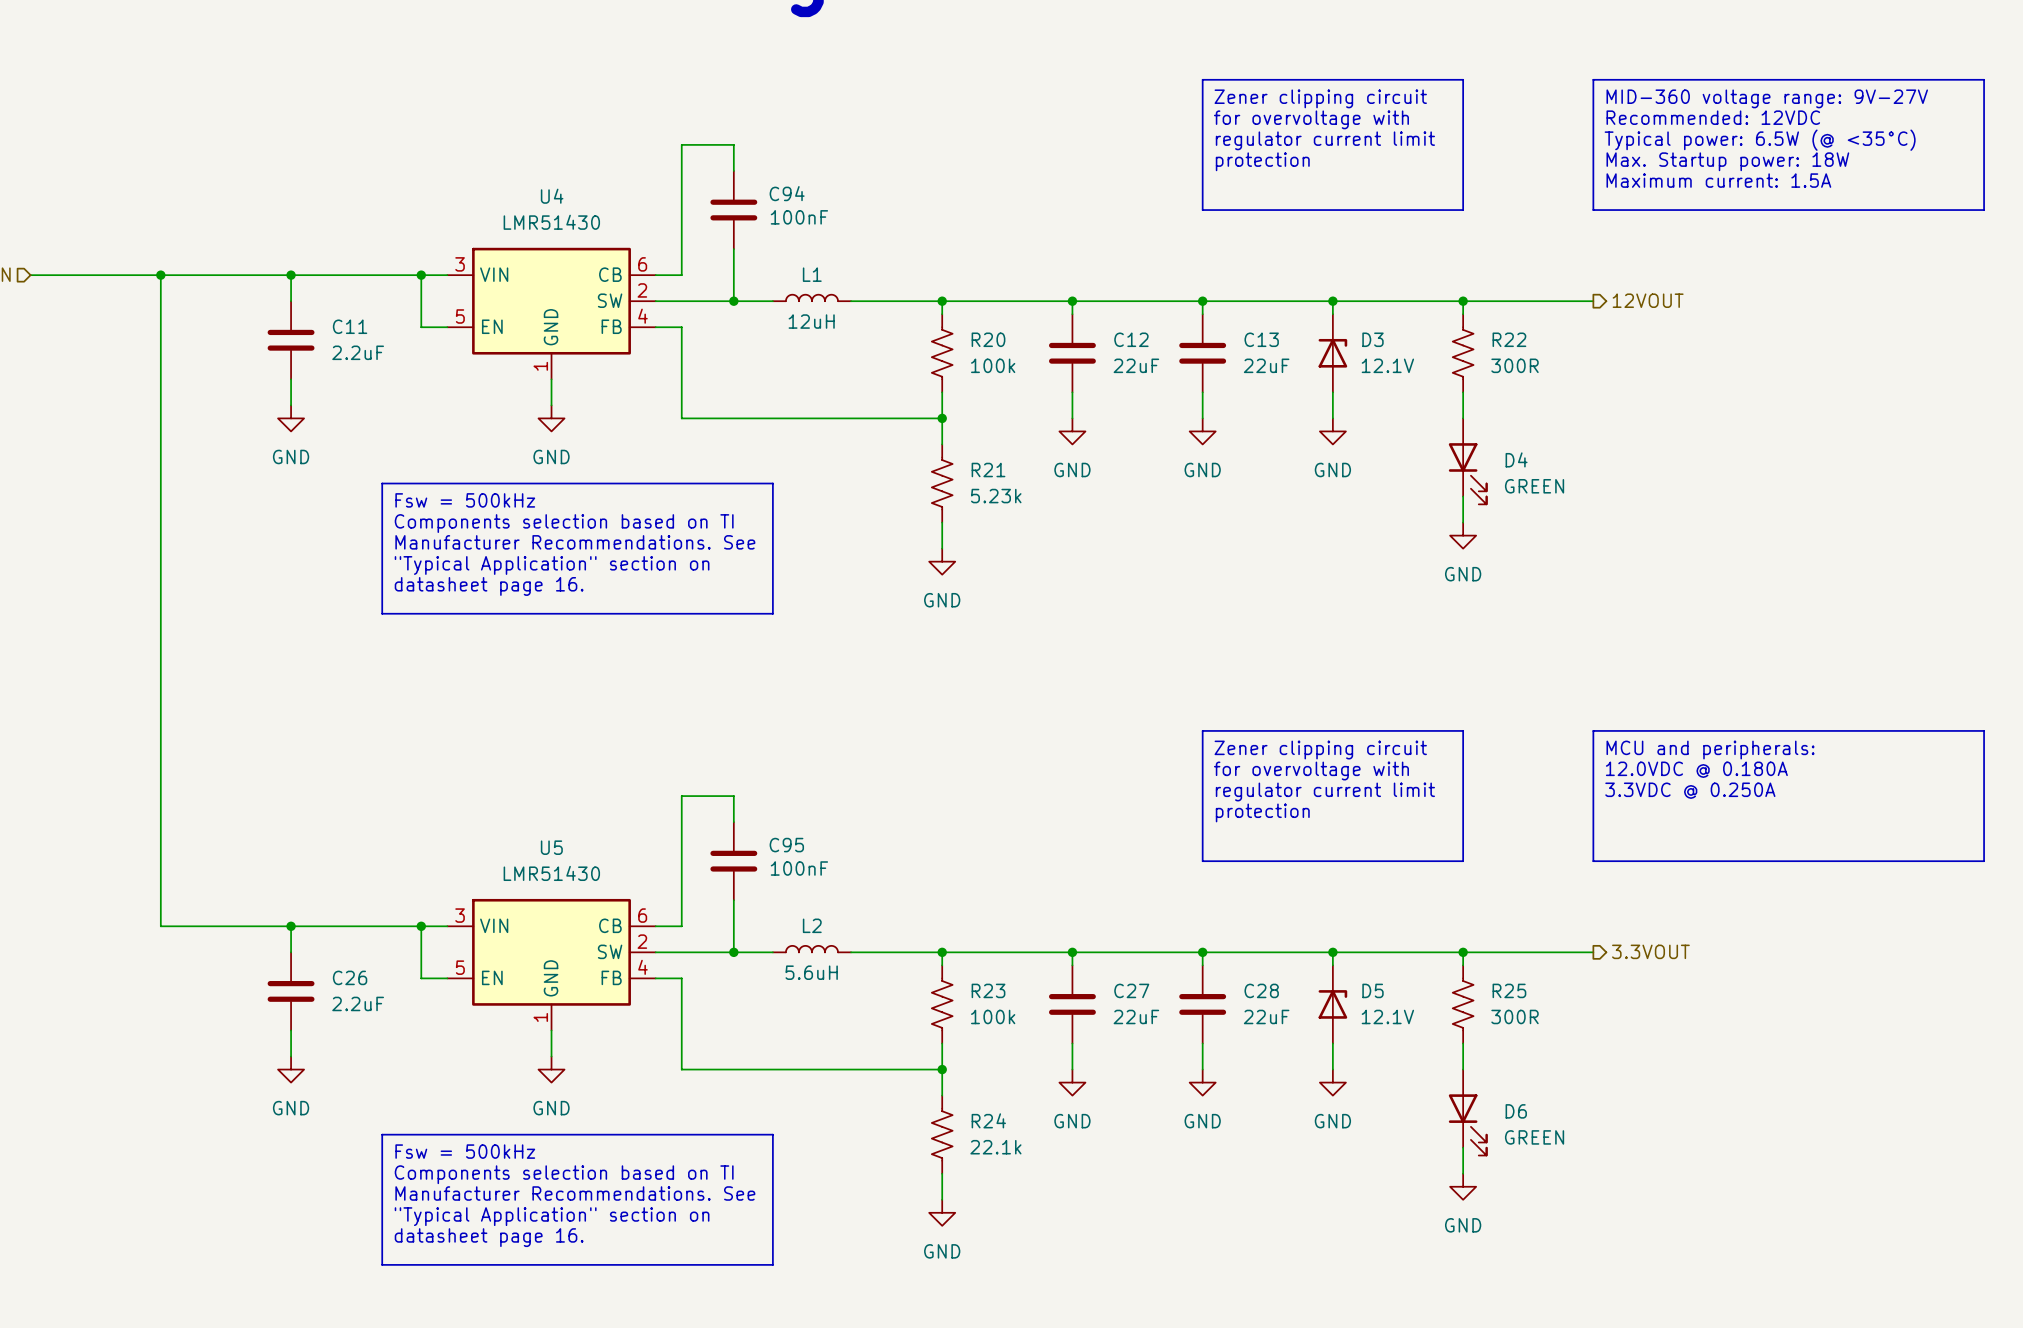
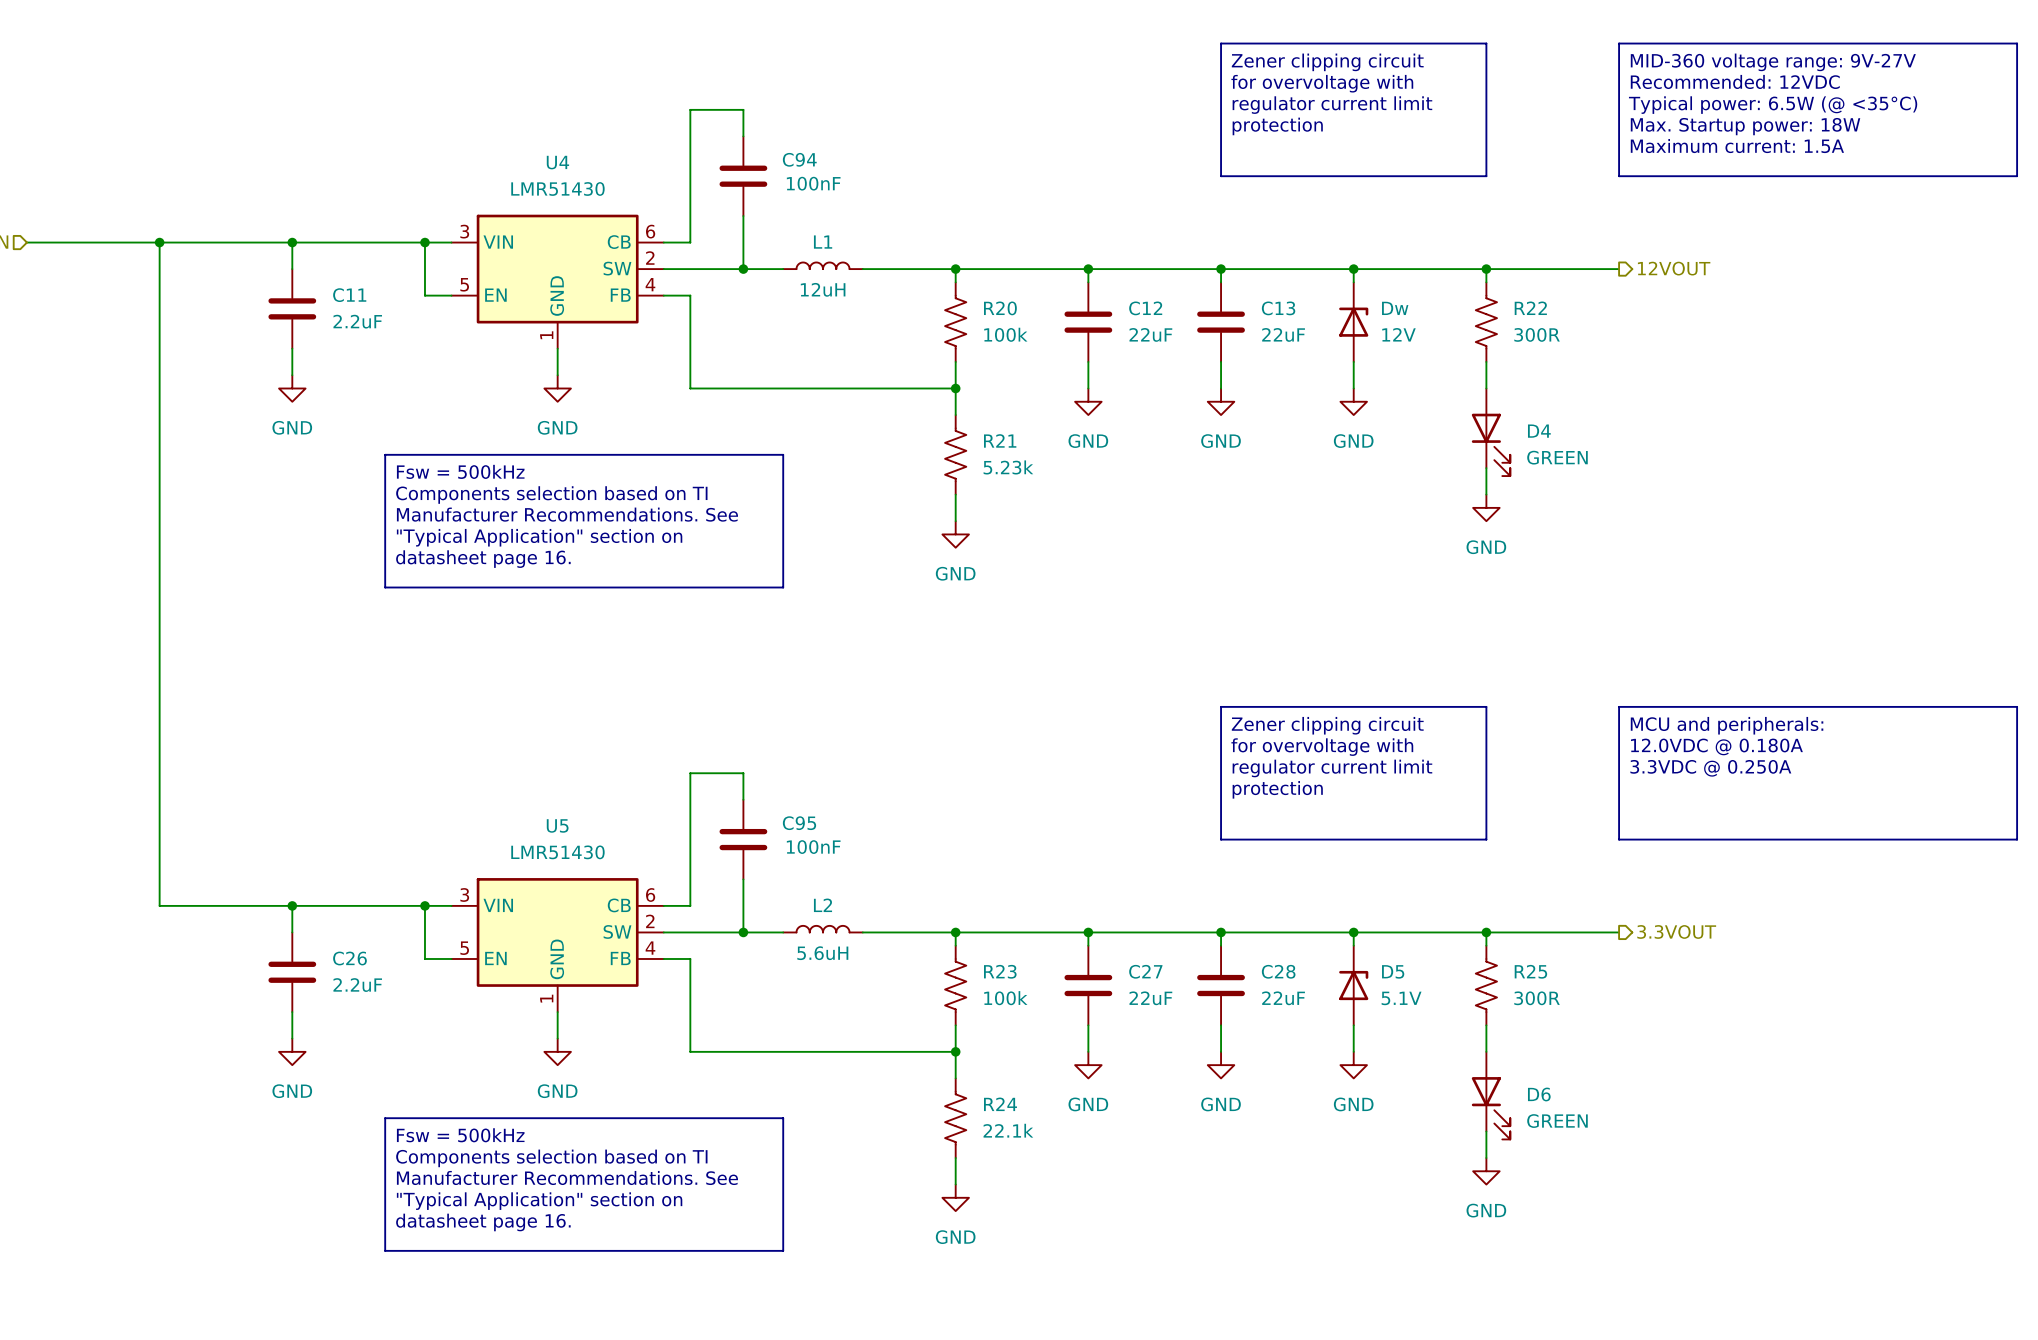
D3 name: D3 (1372, 339) -> Dw (1395, 308)
D3 value: 12.1V (1387, 365) -> 12V (1398, 334)
D5 value: 12.1V (1387, 1016) -> 5.1V (1401, 998)

